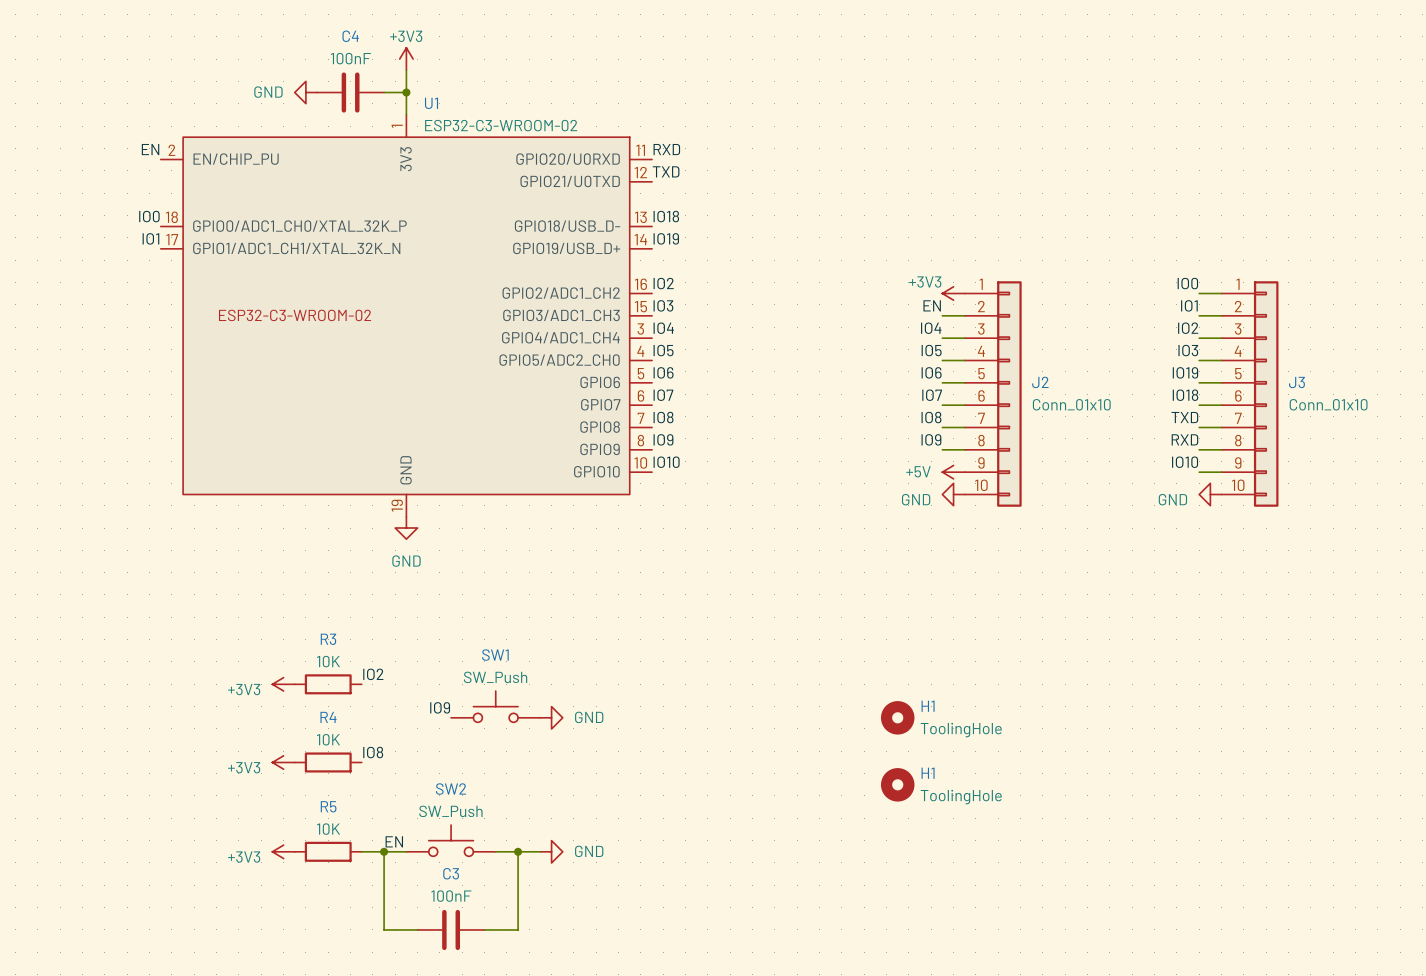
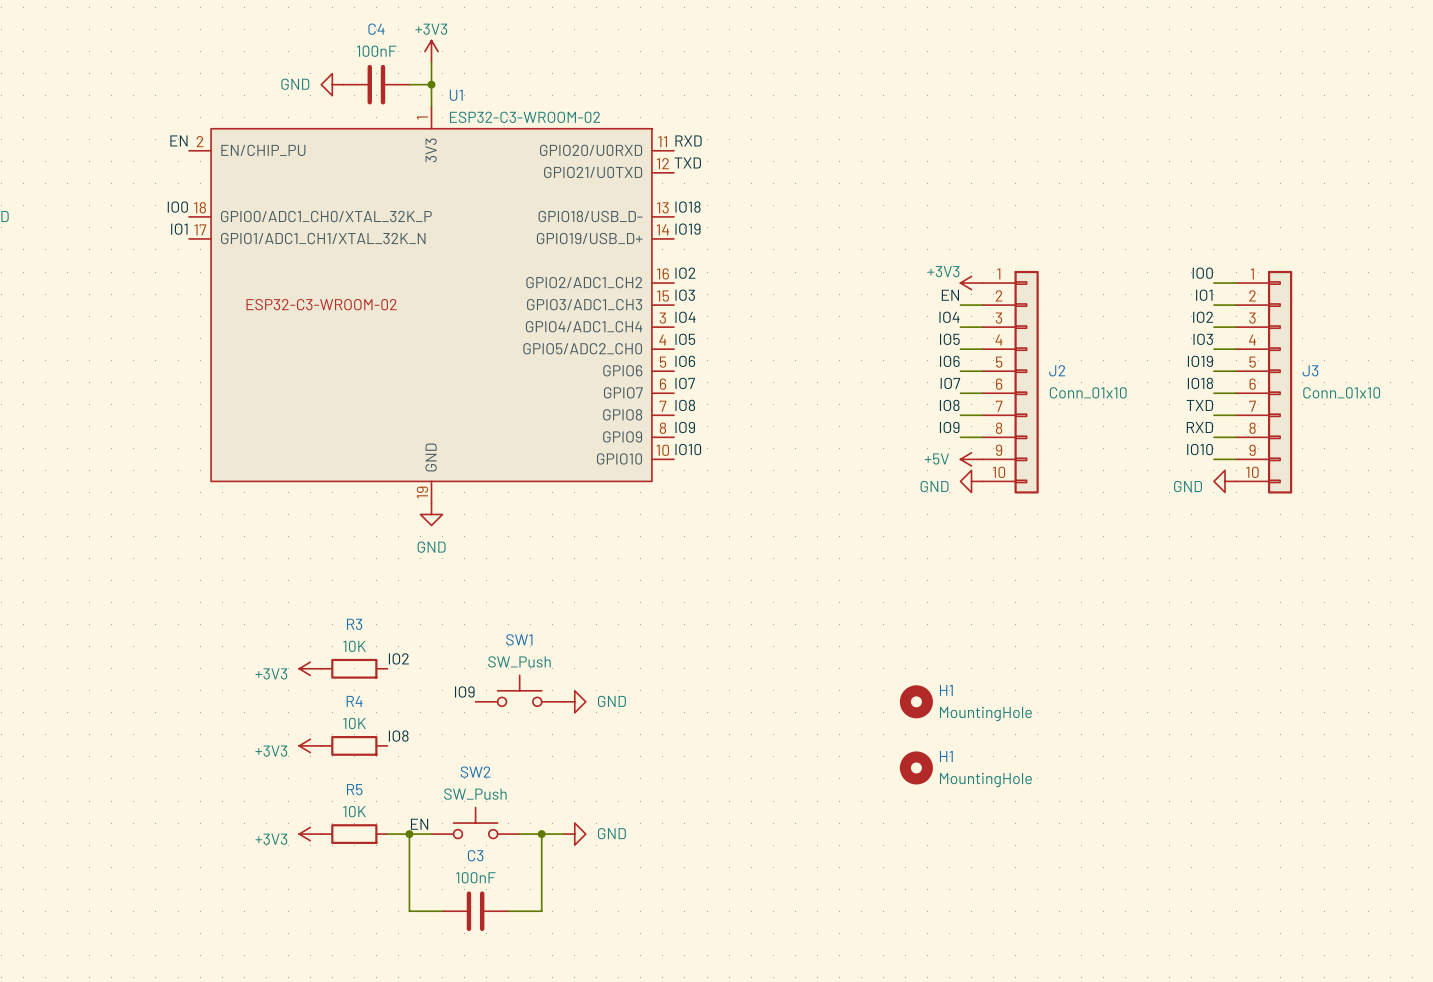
H1 value: ToolingHole (961, 730) -> MountingHole (985, 713)
H1 value: ToolingHole (961, 797) -> MountingHole (985, 780)

